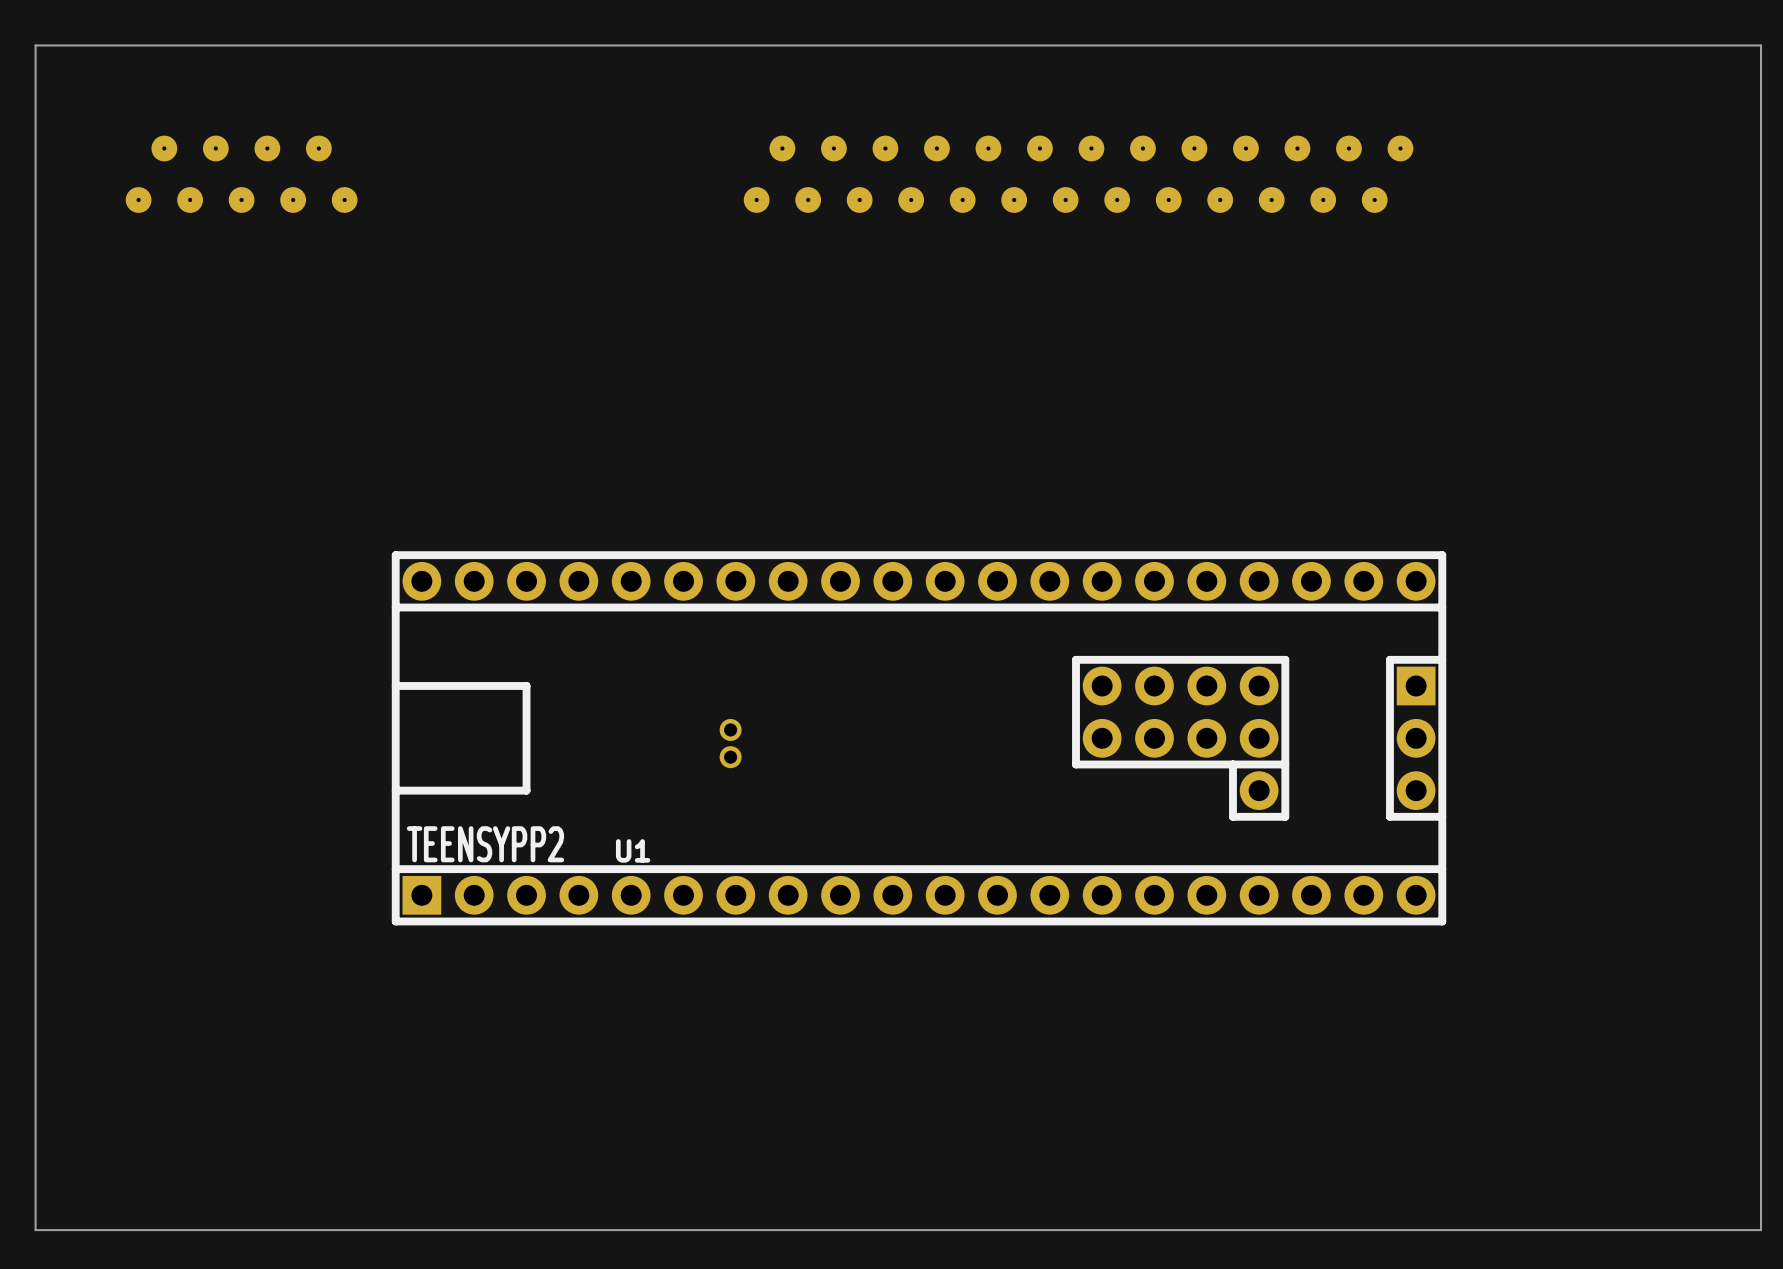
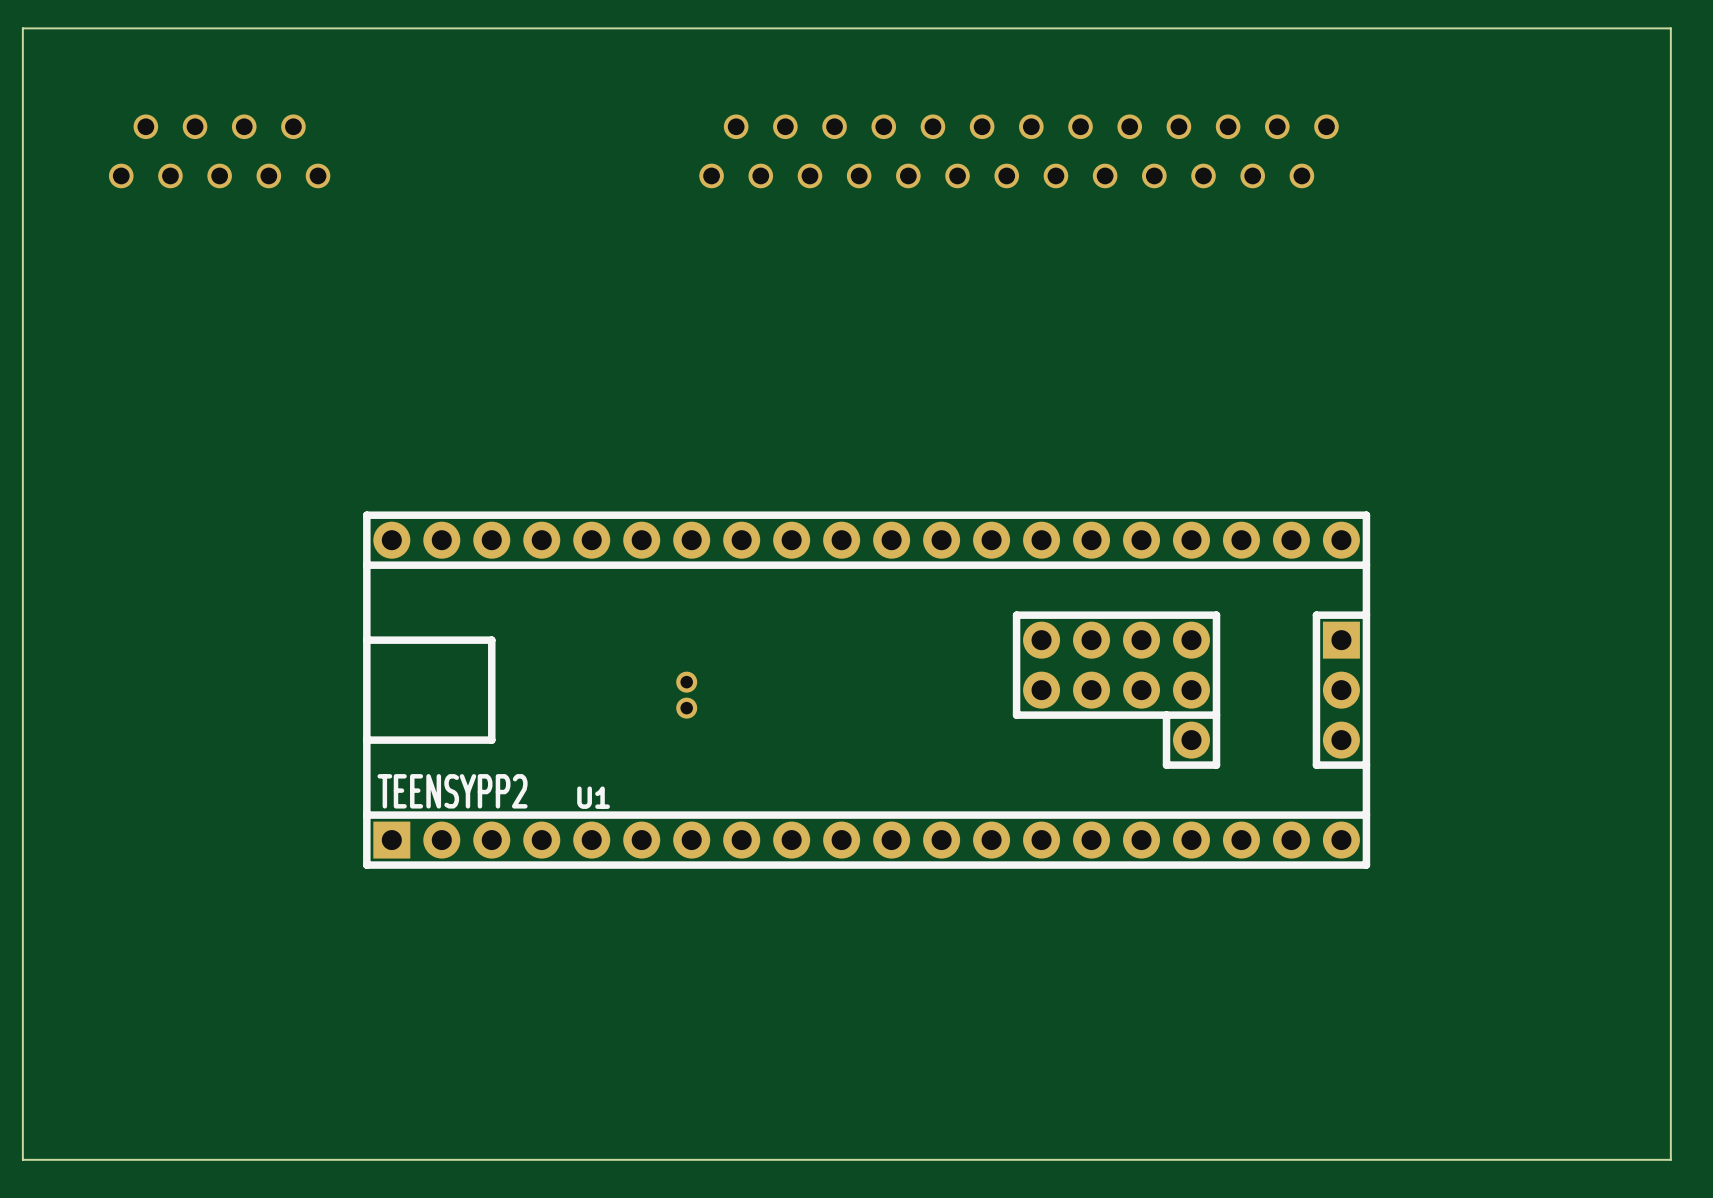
part footprint: [125, 135, 358, 213] -> [108, 114, 331, 189]
part footprint: [743, 135, 1414, 213] -> [699, 114, 1339, 189]

